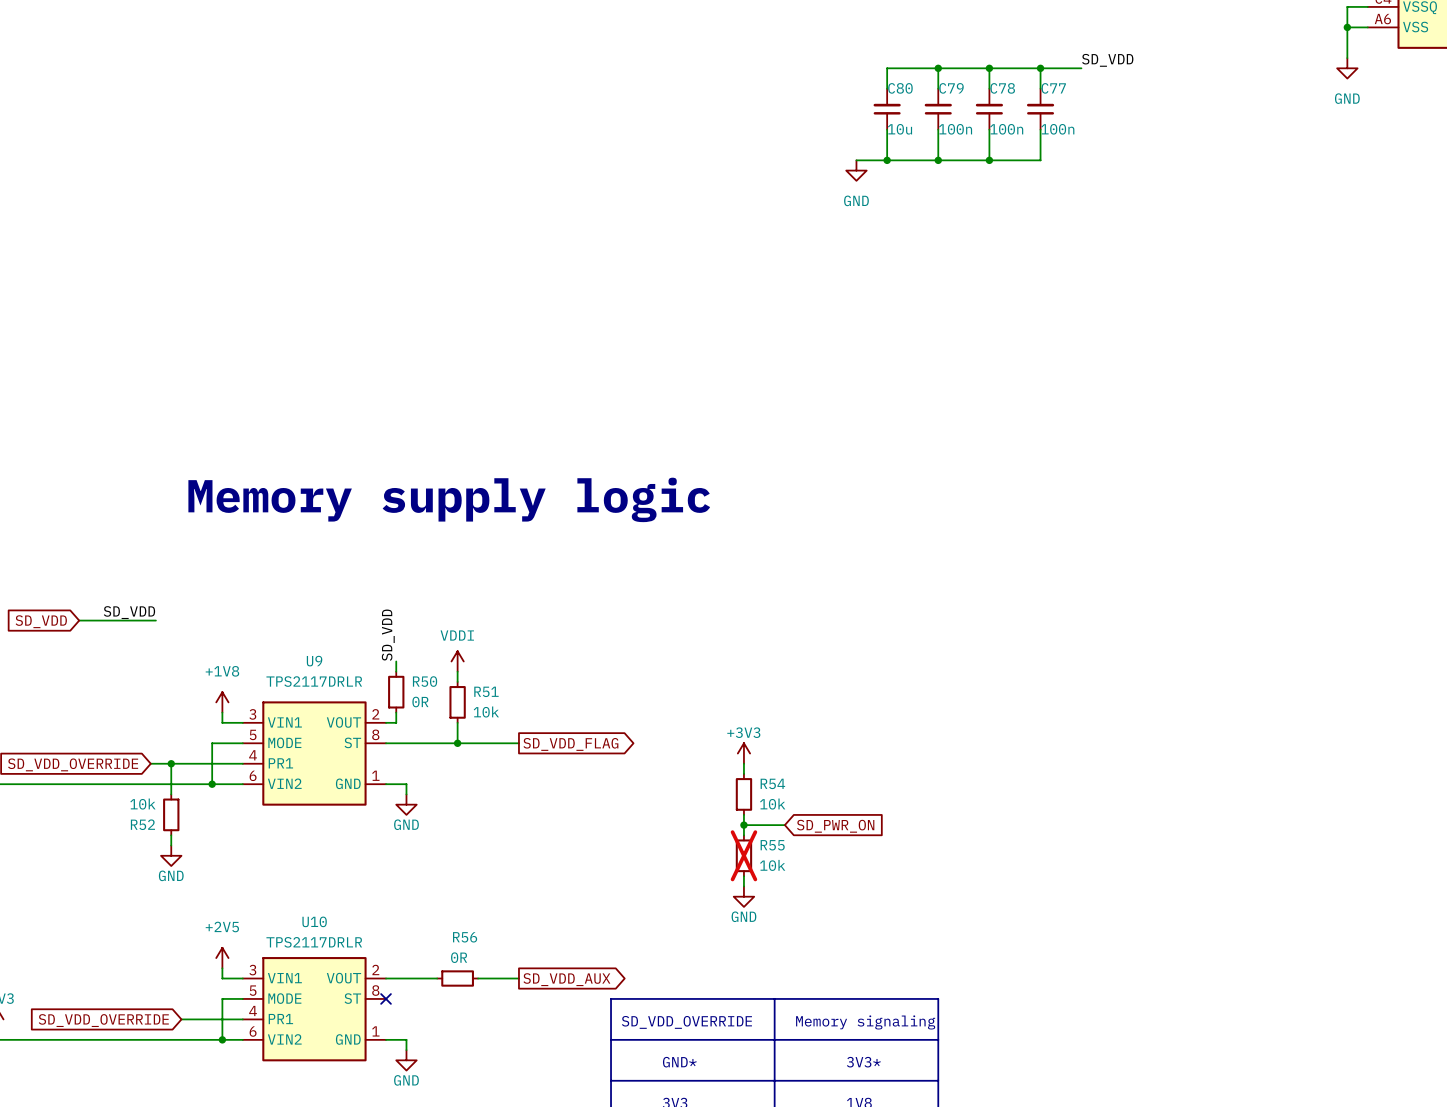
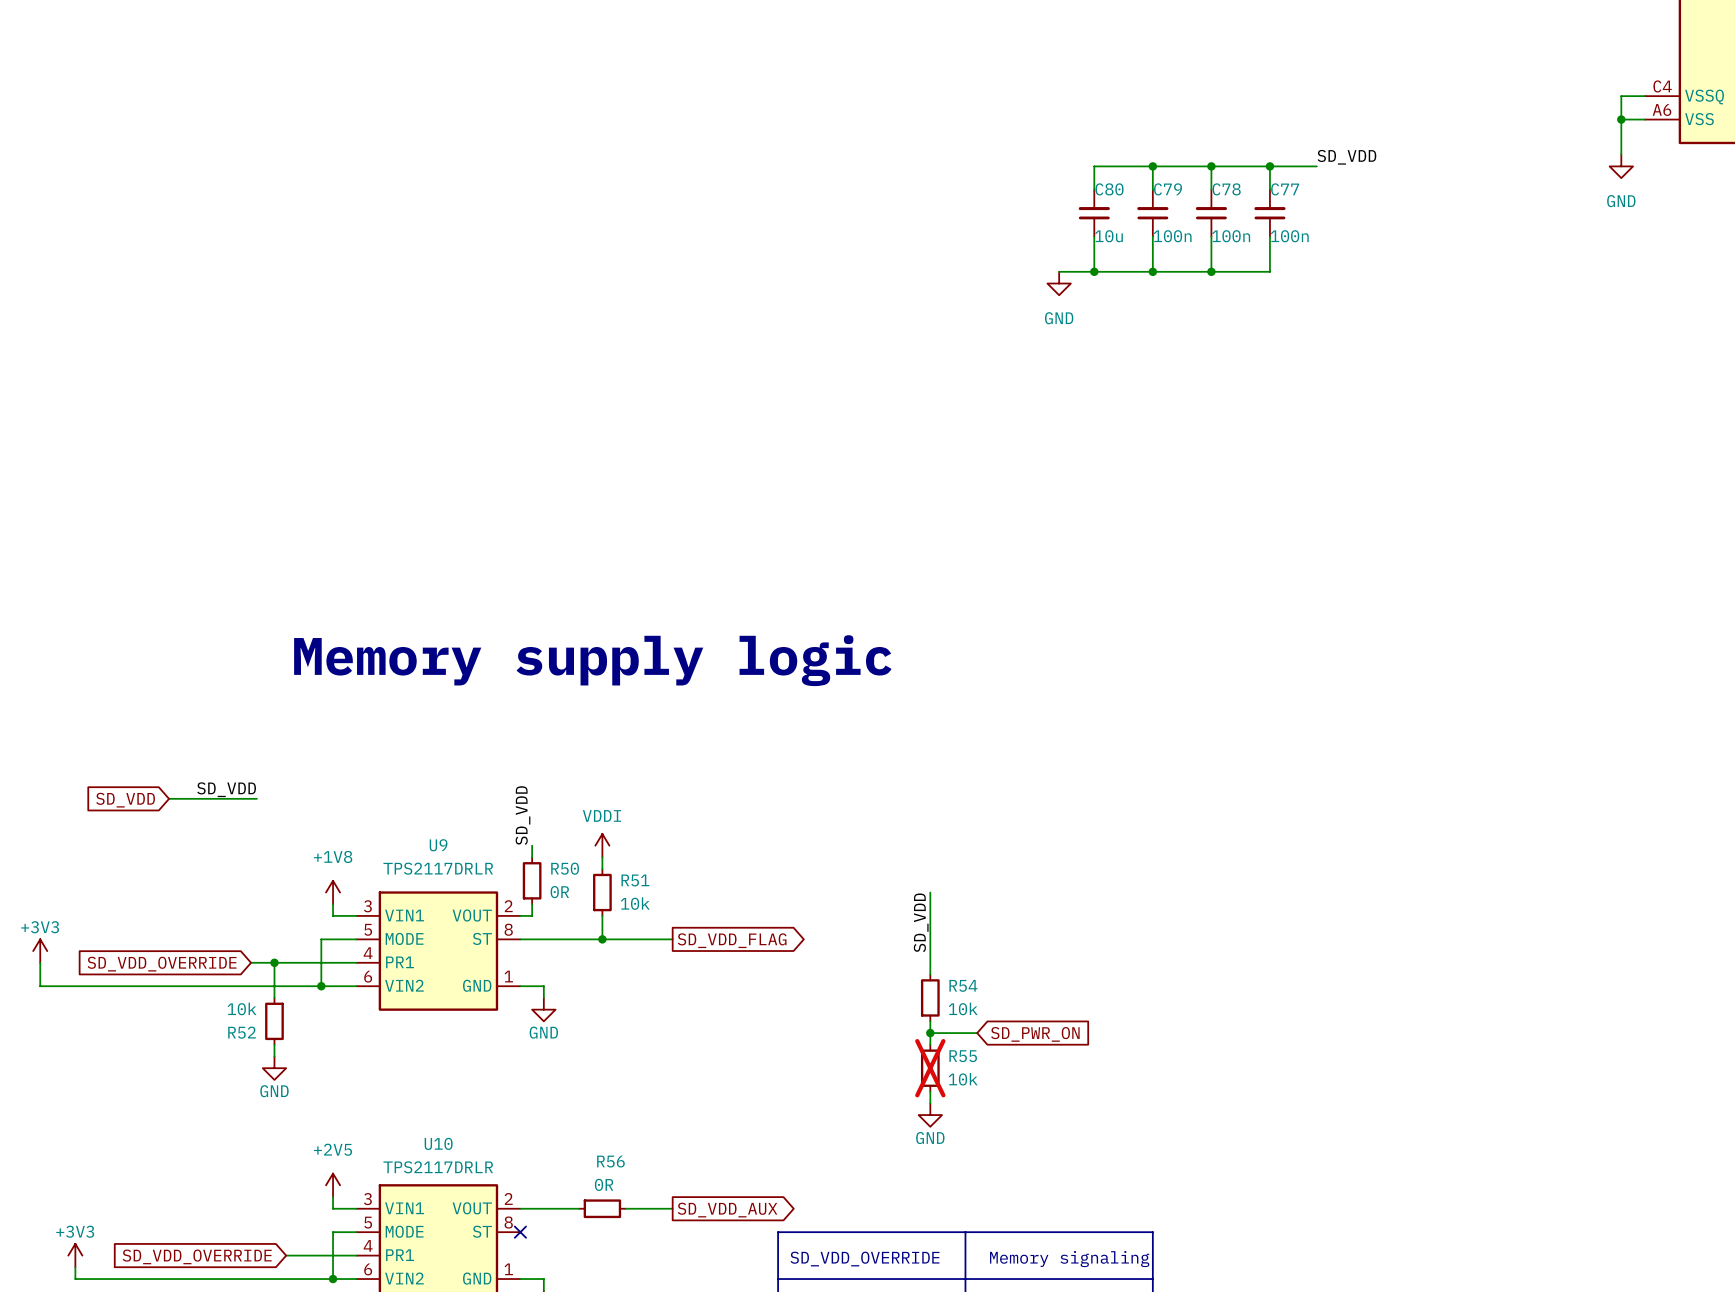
wire: none -> (930, 892) (930, 962)
label: none -> SD_VDD (921, 922)
power symbol: +3V3 (743, 753) -> none

